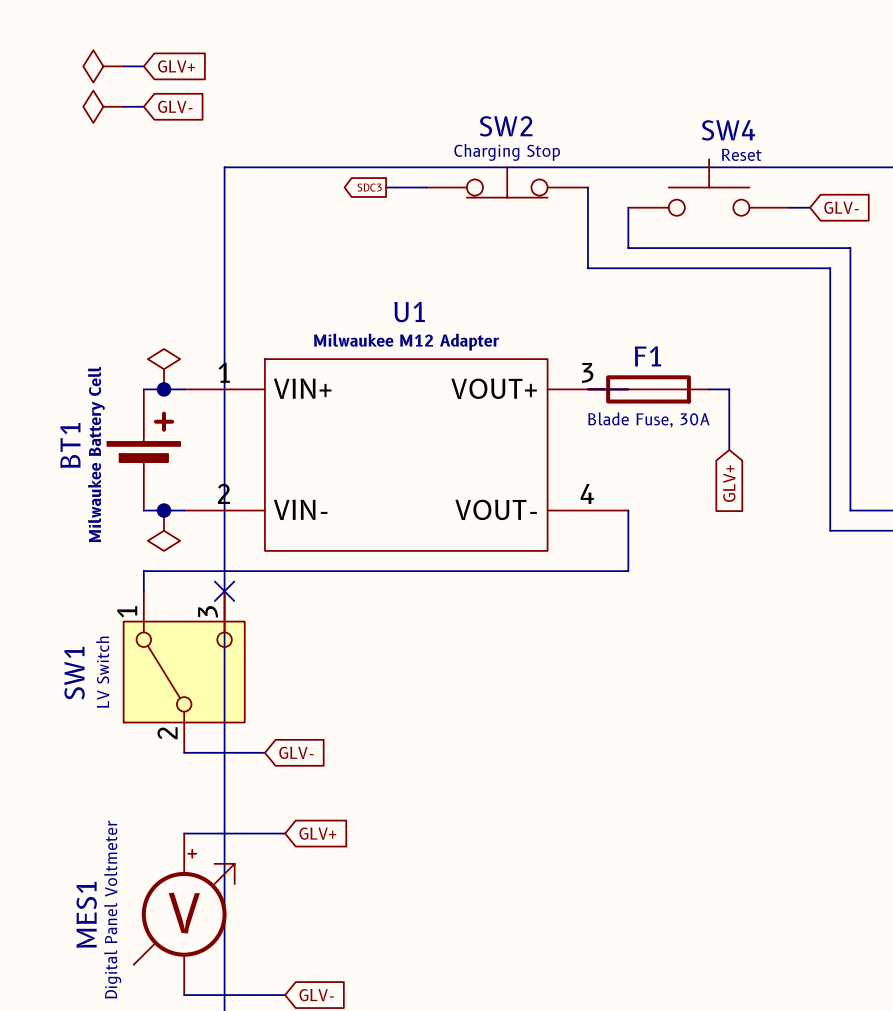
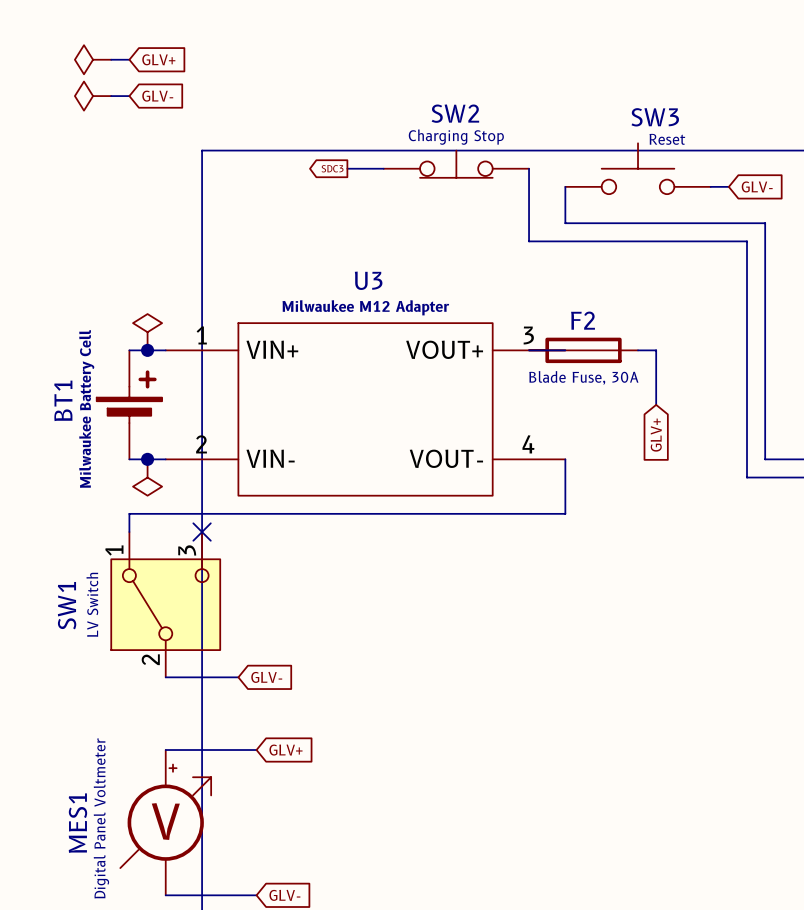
SW4 name: SW4 (728, 130) -> SW3 (655, 117)
U1 name: U1 (409, 312) -> U3 (368, 280)
F1 name: F1 (647, 356) -> F2 (583, 320)

